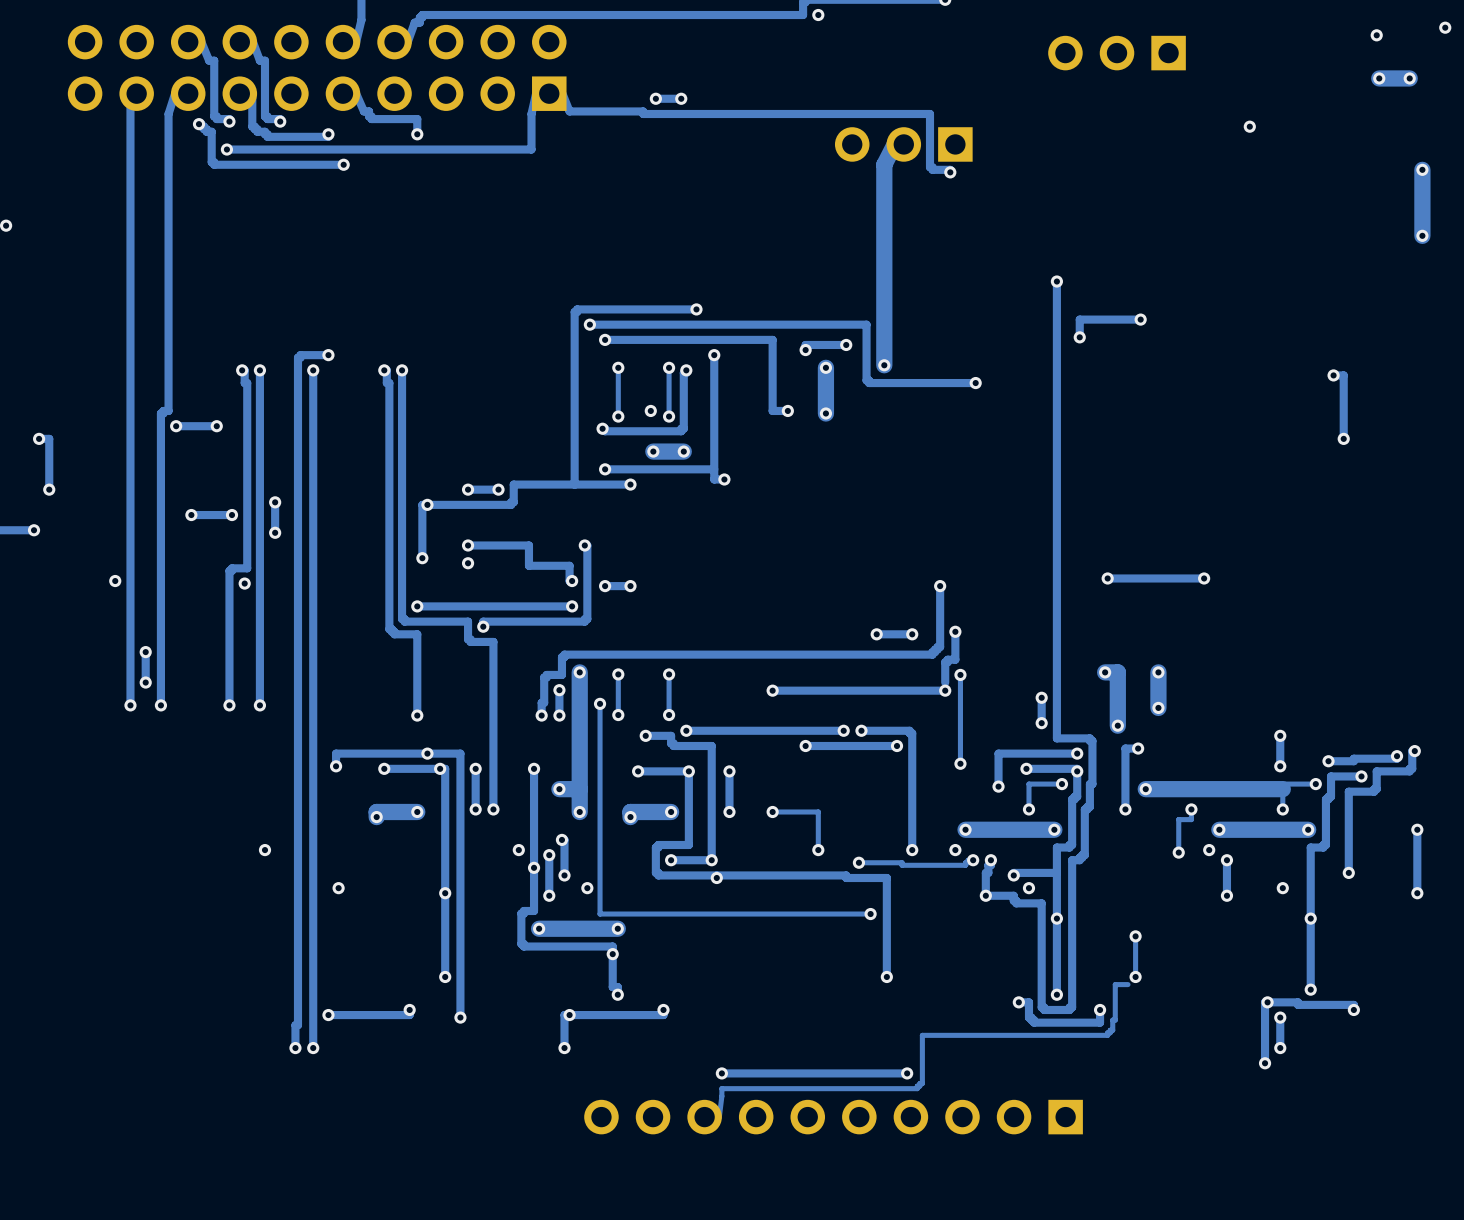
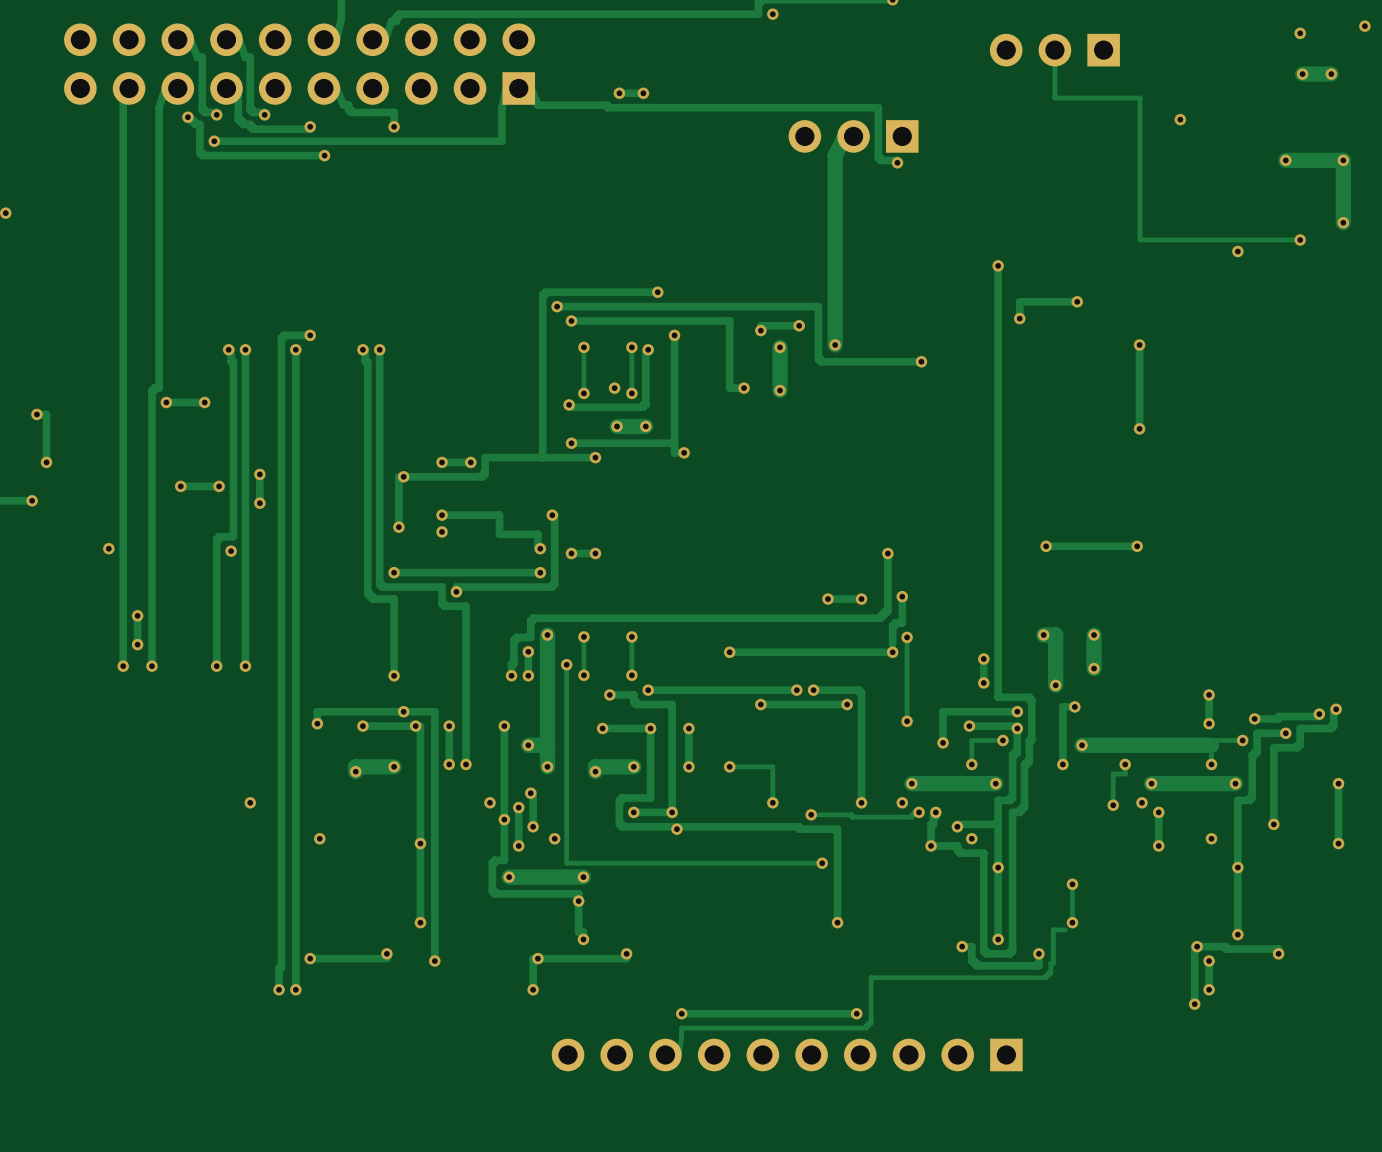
track: none -> (1054, 50) (1054, 98) (1140, 98) (1140, 239) (1300, 239)
via: none -> (1285, 160)
track: none -> (1343, 160) (1285, 160)
via: none -> (1300, 239)
via: none -> (1237, 251)
track: none -> (1139, 344) (1139, 428)
via: none -> (1139, 344)
track: (1333, 375) (1343, 375) (1343, 438) -> none
via: (1333, 375) -> none
via: (1343, 438) -> none
via: none -> (1139, 428)

